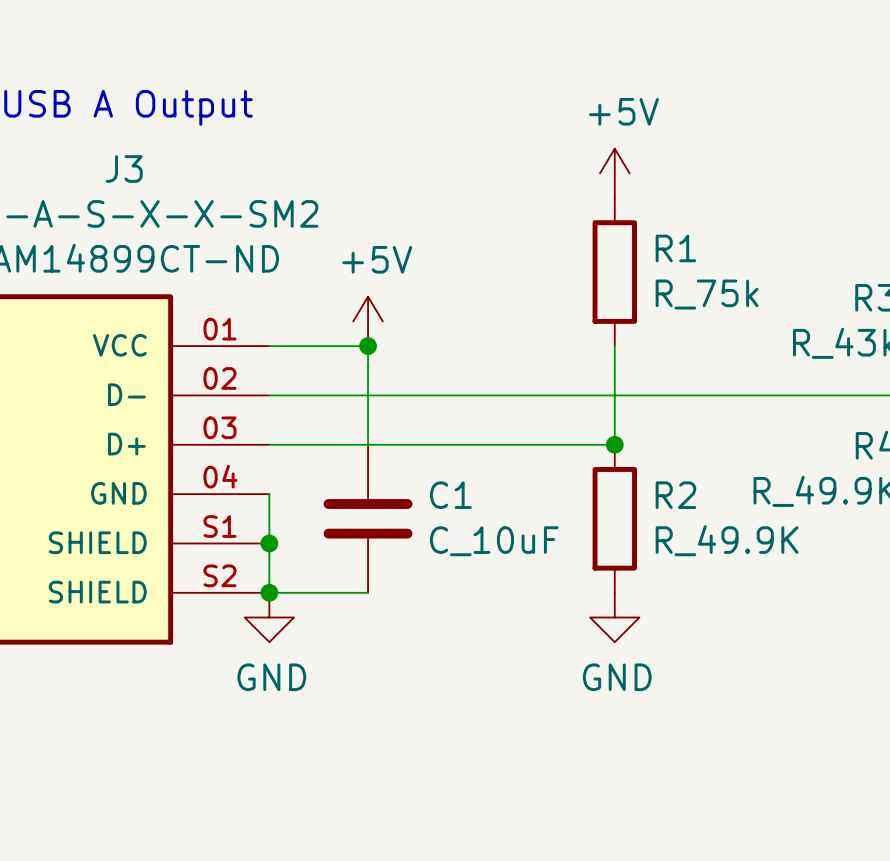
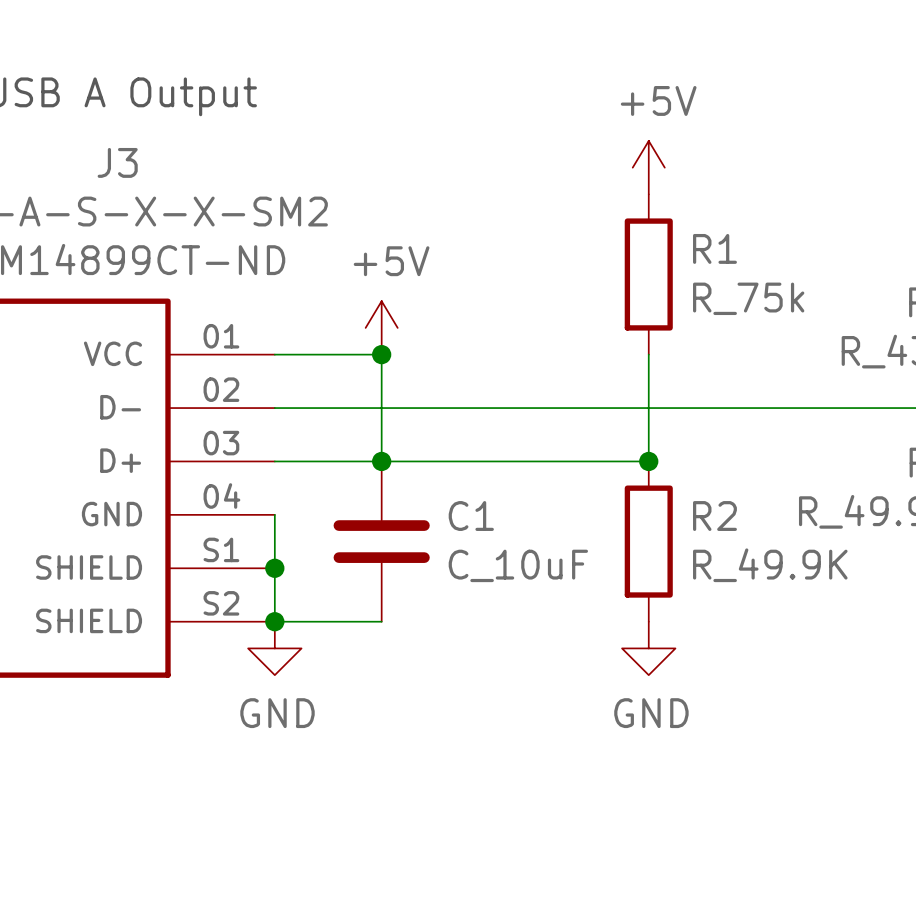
junction: none -> (381, 461)

